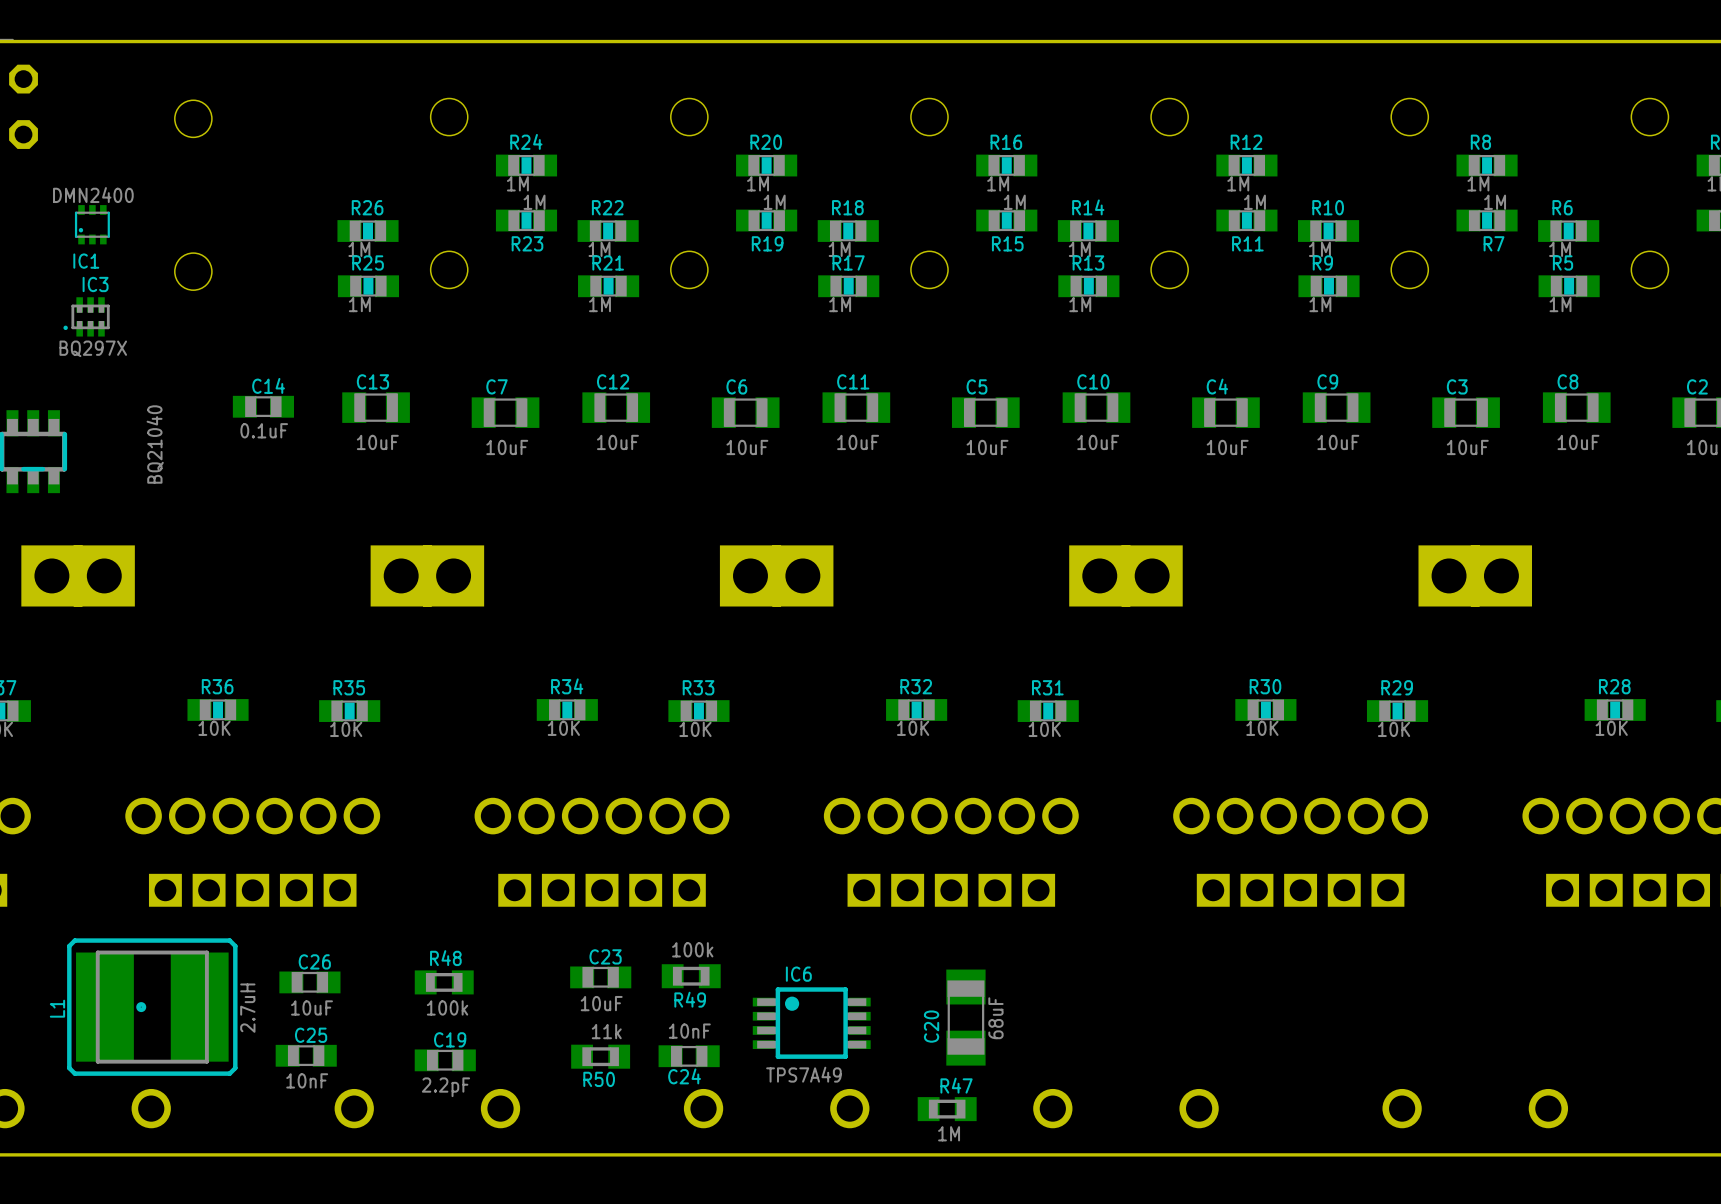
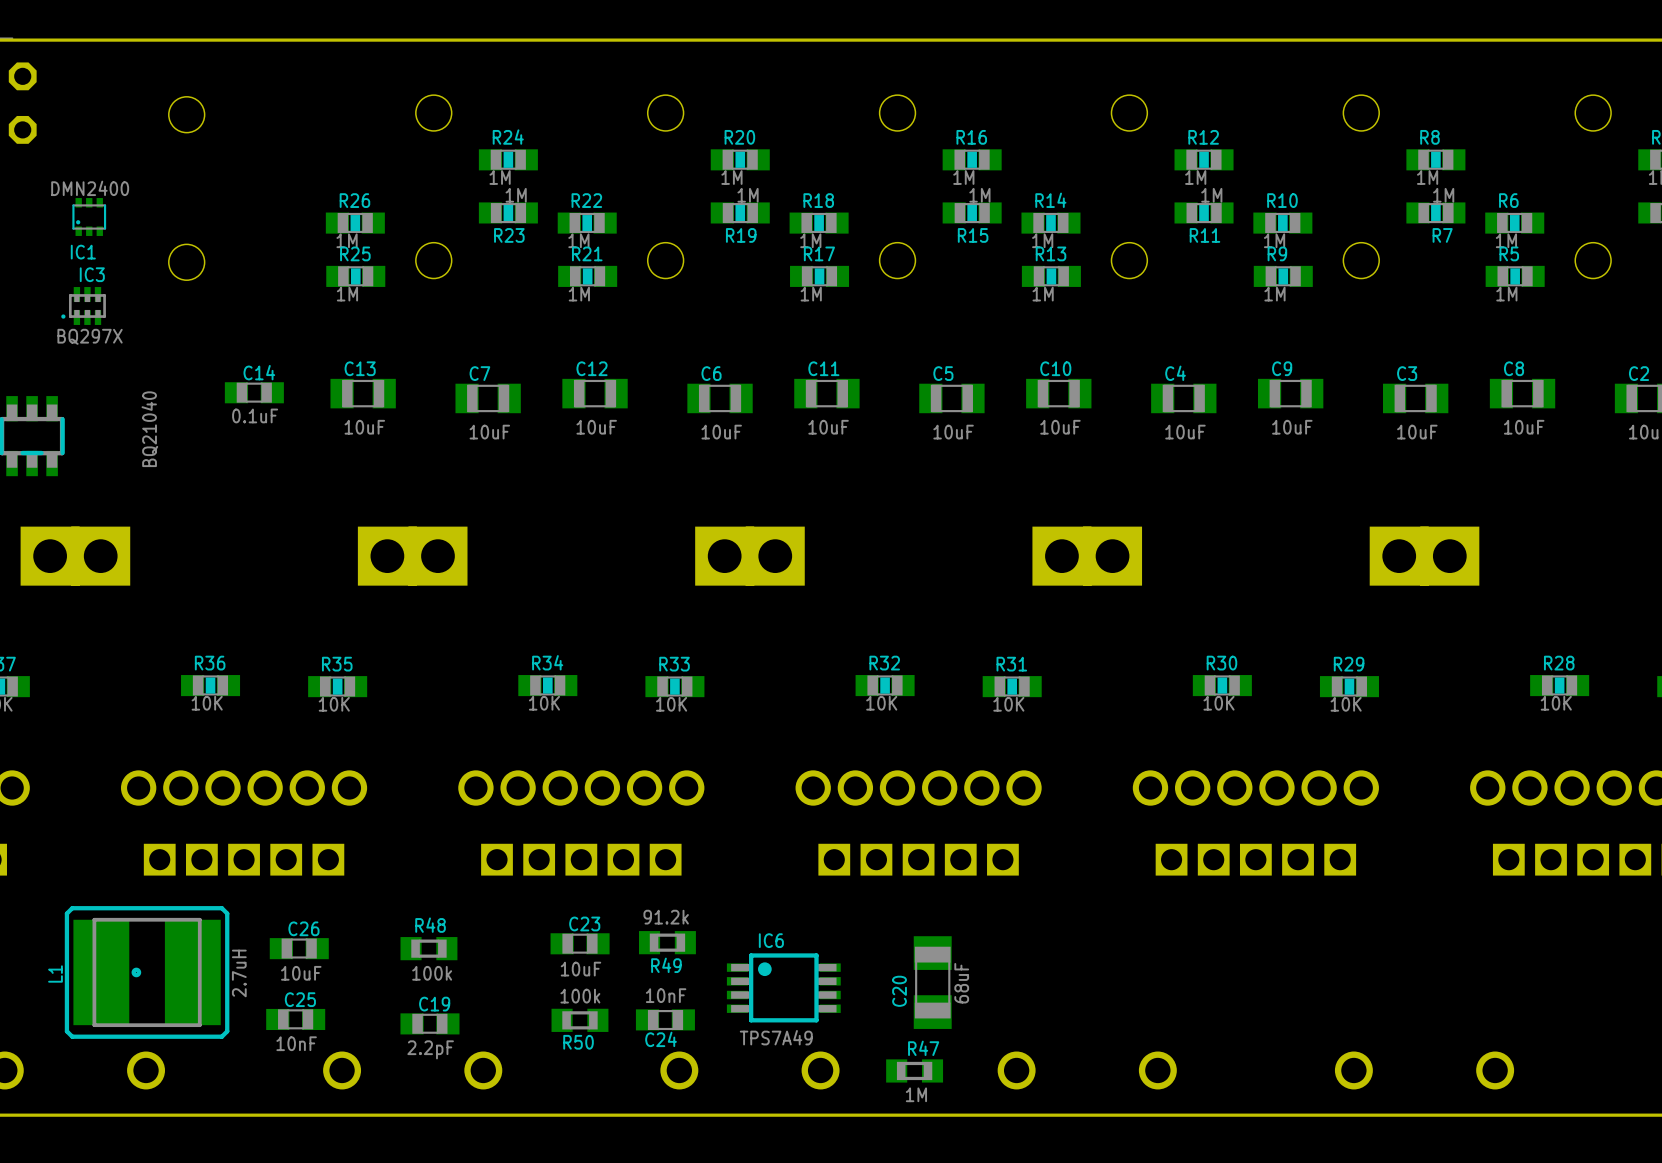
R49 value: 100k (692, 949) -> 91.2k (666, 917)
R50 value: 11k (606, 1031) -> 100k (580, 996)

